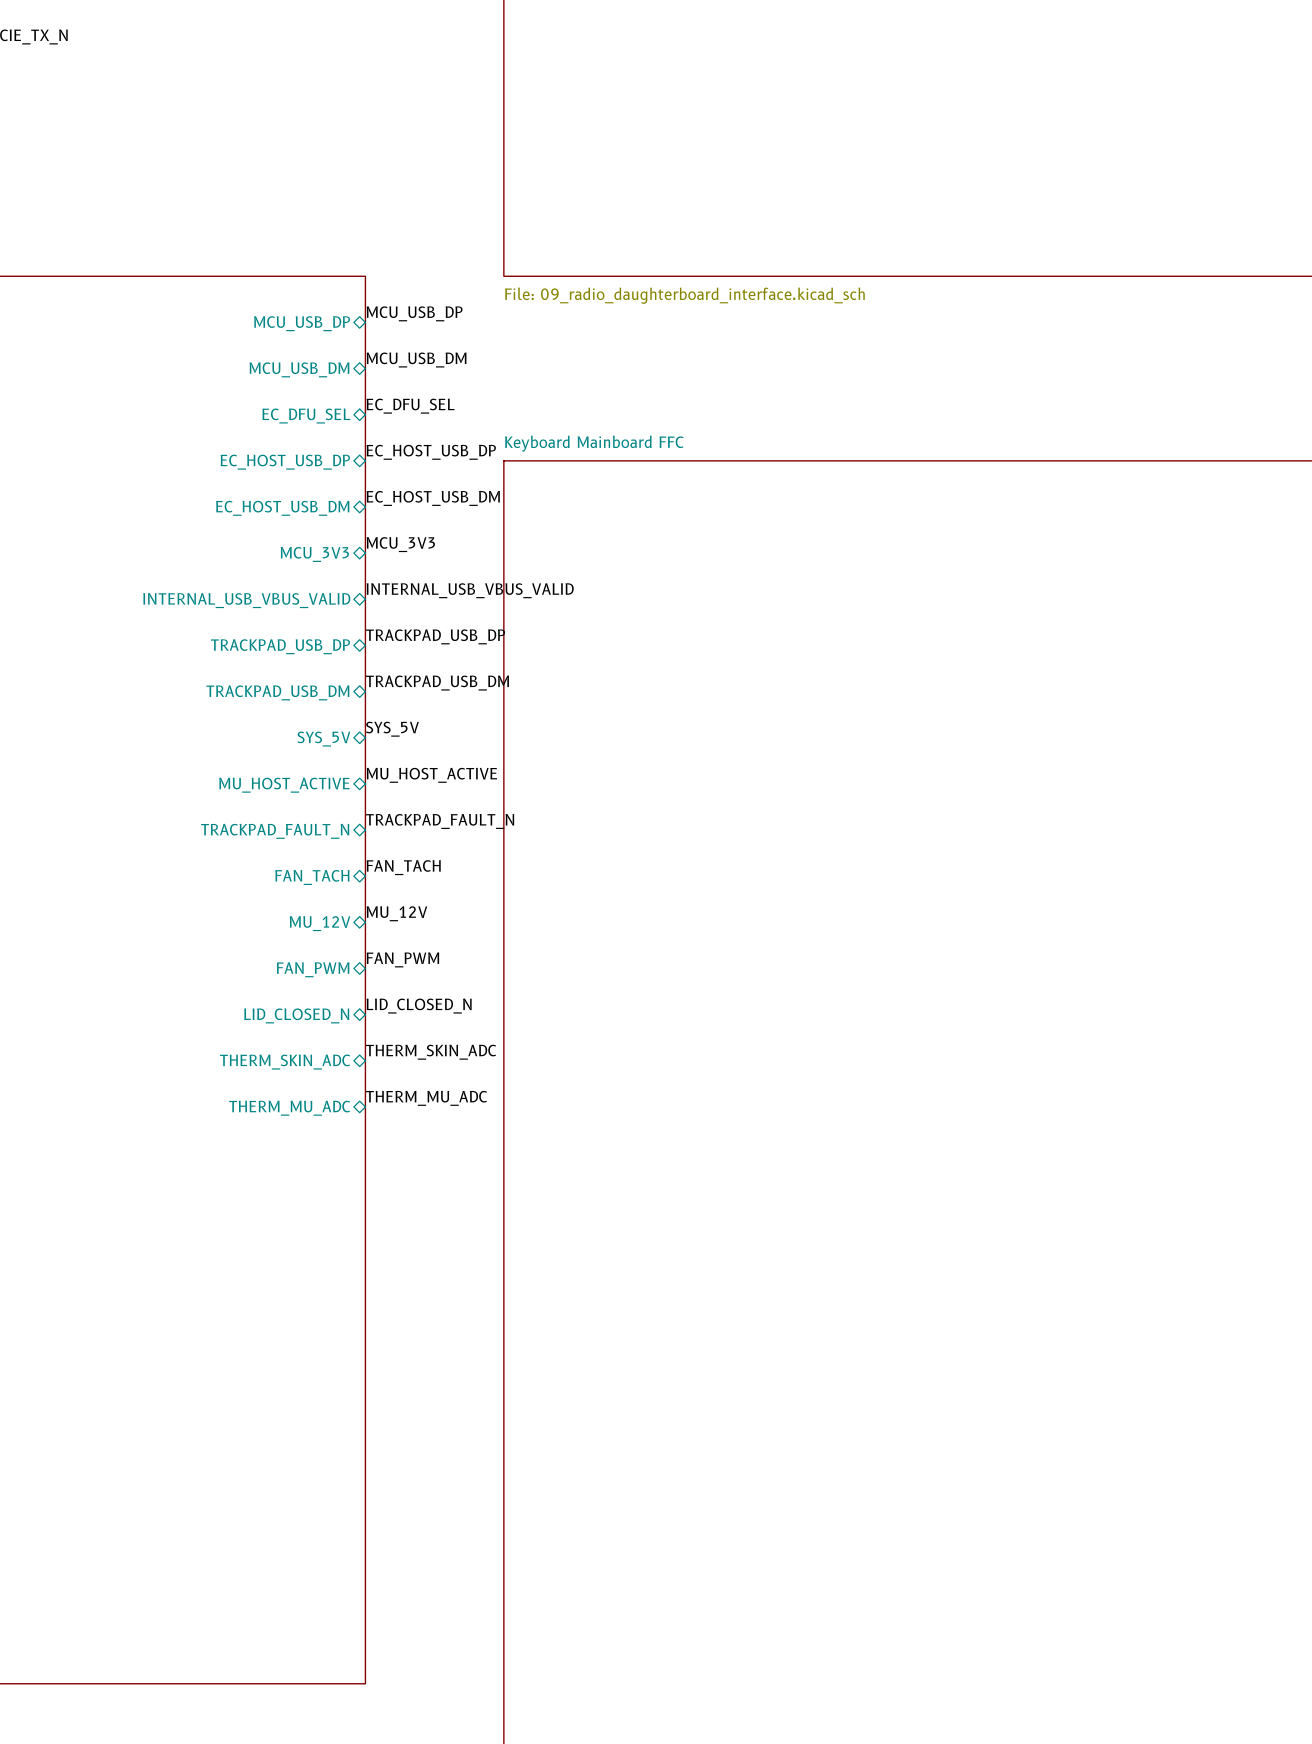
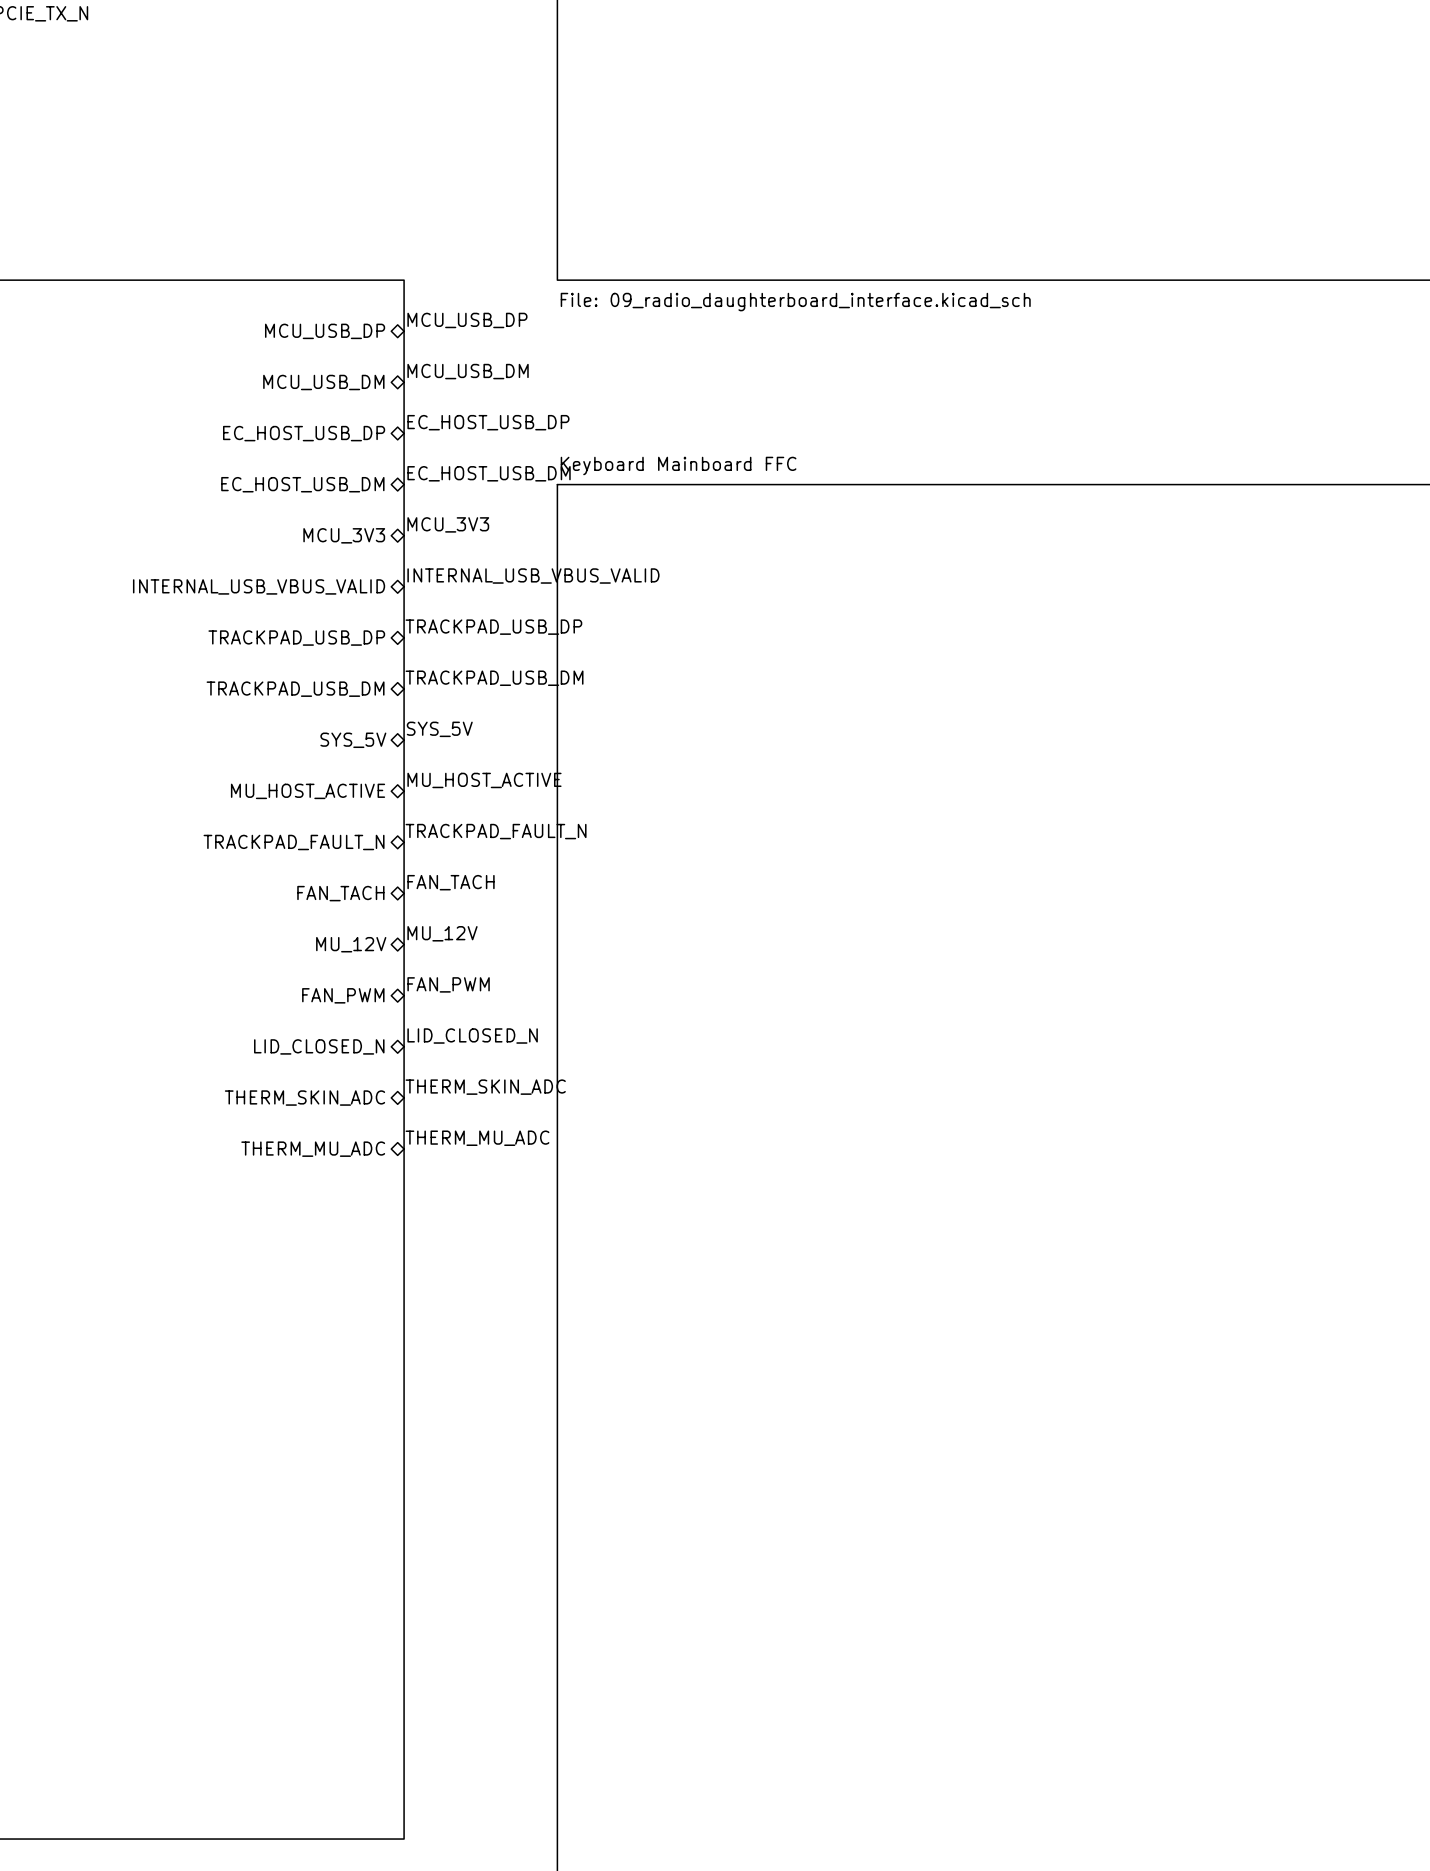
label: EC_DFU_SEL (410, 406) -> EC_HOST_USB_DP (488, 422)
sheet pin: EC_DFU_SEL (306, 416) -> EC_HOST_USB_DP (304, 433)
label: EC_HOST_USB_DP (431, 452) -> EC_HOST_USB_DM (489, 473)
sheet pin: EC_HOST_USB_DP (285, 462) -> EC_HOST_USB_DM (302, 484)
label: EC_HOST_USB_DM (433, 498) -> MCU_3V3 (448, 524)
sheet pin: EC_HOST_USB_DM (282, 508) -> MCU_3V3 (344, 535)
label: MCU_3V3 (400, 544) -> INTERNAL_USB_VBUS_VALID (533, 576)
sheet pin: MCU_3V3 (314, 554) -> INTERNAL_USB_VBUS_VALID (259, 586)
label: INTERNAL_USB_VBUS_VALID (470, 590) -> TRACKPAD_USB_DP (493, 627)
sheet pin: INTERNAL_USB_VBUS_VALID (246, 600) -> TRACKPAD_USB_DP (296, 638)
label: TRACKPAD_USB_DP (435, 636) -> TRACKPAD_USB_DM (494, 678)
sheet pin: TRACKPAD_USB_DP (280, 646) -> TRACKPAD_USB_DM (295, 689)
label: TRACKPAD_USB_DM (437, 683) -> SYS_5V (439, 729)
sheet pin: TRACKPAD_USB_DM (277, 692) -> SYS_5V (353, 740)
label: SYS_5V (392, 729) -> MU_HOST_ACTIVE (484, 780)
sheet pin: SYS_5V (323, 739) -> MU_HOST_ACTIVE (308, 791)
label: MU_HOST_ACTIVE (431, 775) -> TRACKPAD_FAULT_N (496, 831)
sheet pin: MU_HOST_ACTIVE (284, 785) -> TRACKPAD_FAULT_N (294, 842)
label: TRACKPAD_FAULT_N (440, 821) -> FAN_TACH (451, 882)
sheet pin: TRACKPAD_FAULT_N (275, 831) -> FAN_TACH (340, 893)
label: FAN_TACH (403, 867) -> MU_12V (442, 933)
sheet pin: FAN_TACH (312, 877) -> MU_12V (351, 944)
label: MU_12V (396, 913) -> FAN_PWM (448, 984)
sheet pin: MU_12V (320, 923) -> FAN_PWM (343, 995)
label: FAN_PWM (402, 959) -> LID_CLOSED_N (472, 1036)
sheet pin: FAN_PWM (313, 969) -> LID_CLOSED_N (319, 1046)
label: LID_CLOSED_N (419, 1006) -> THERM_SKIN_ADC (485, 1087)
sheet pin: LID_CLOSED_N (296, 1015) -> THERM_SKIN_ADC (304, 1098)
label: THERM_SKIN_ADC (431, 1052) -> THERM_MU_ADC (477, 1138)
sheet pin: THERM_SKIN_ADC (285, 1062) -> THERM_MU_ADC (313, 1149)
label: THERM_MU_ADC (426, 1098) -> none
sheet pin: THERM_MU_ADC (289, 1108) -> none

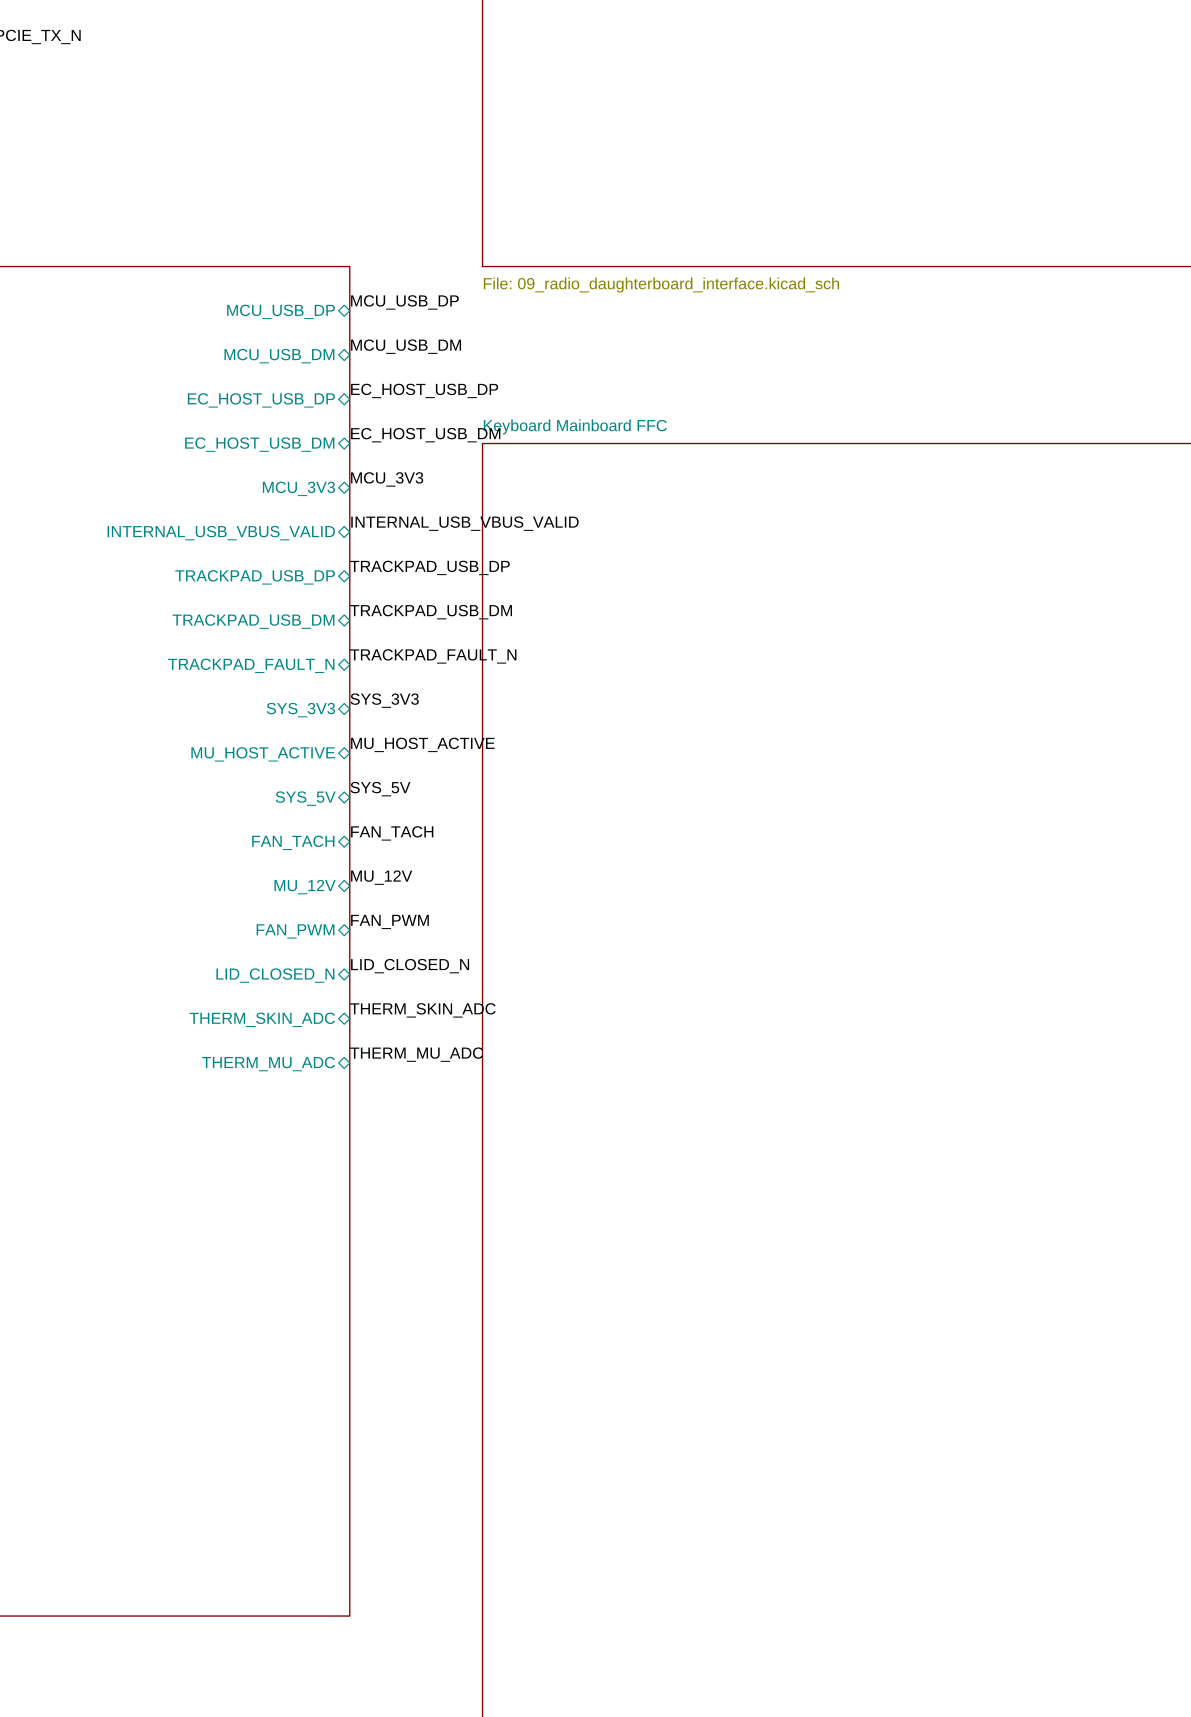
label: SYS_5V (439, 729) -> TRACKPAD_FAULT_N (433, 656)
sheet pin: SYS_5V (353, 740) -> TRACKPAD_FAULT_N (251, 665)
label: MU_HOST_ACTIVE (484, 780) -> SYS_3V3 (384, 700)
sheet pin: MU_HOST_ACTIVE (308, 791) -> SYS_3V3 (300, 710)
label: TRACKPAD_FAULT_N (496, 831) -> MU_HOST_ACTIVE (422, 744)
sheet pin: TRACKPAD_FAULT_N (294, 842) -> MU_HOST_ACTIVE (263, 754)
label: FAN_TACH (451, 882) -> SYS_5V (380, 789)
sheet pin: FAN_TACH (340, 893) -> SYS_5V (305, 798)
label: MU_12V (442, 933) -> FAN_TACH (392, 833)
sheet pin: MU_12V (351, 944) -> FAN_TACH (293, 842)
label: FAN_PWM (448, 984) -> MU_12V (381, 877)
sheet pin: FAN_PWM (343, 995) -> MU_12V (305, 887)
label: LID_CLOSED_N (472, 1036) -> FAN_PWM (389, 921)
sheet pin: LID_CLOSED_N (319, 1046) -> FAN_PWM (295, 931)
label: THERM_SKIN_ADC (485, 1087) -> LID_CLOSED_N (410, 966)
sheet pin: THERM_SKIN_ADC (304, 1098) -> LID_CLOSED_N (275, 975)
label: THERM_MU_ADC (477, 1138) -> THERM_SKIN_ADC (422, 1010)
sheet pin: THERM_MU_ADC (313, 1149) -> THERM_SKIN_ADC (262, 1019)
label: none -> THERM_MU_ADC (416, 1054)
sheet pin: none -> THERM_MU_ADC (268, 1064)

